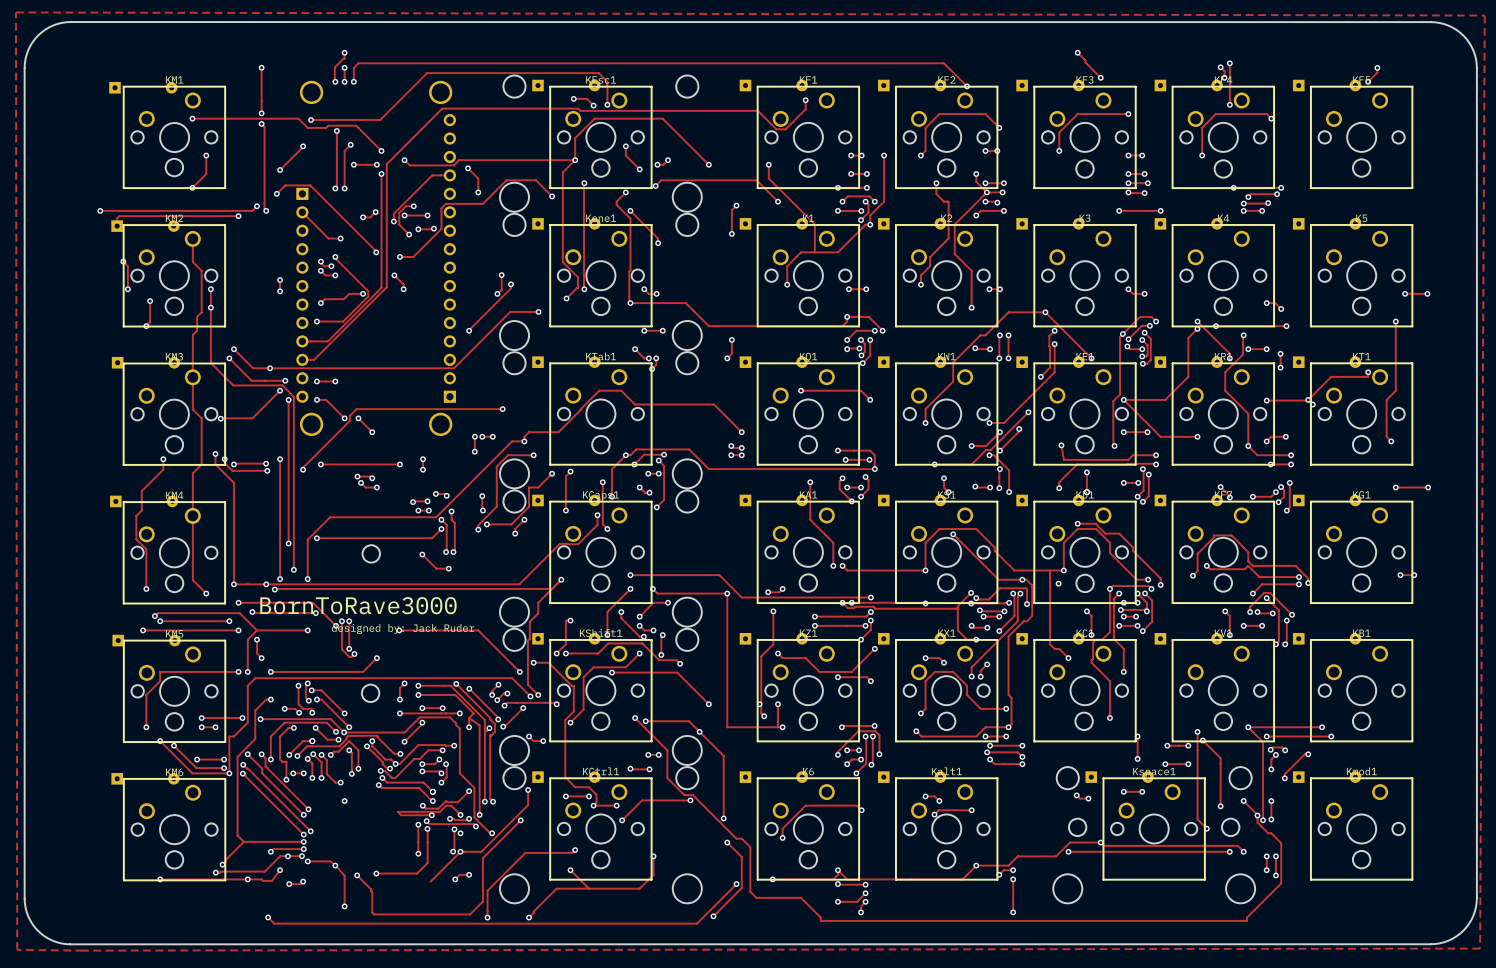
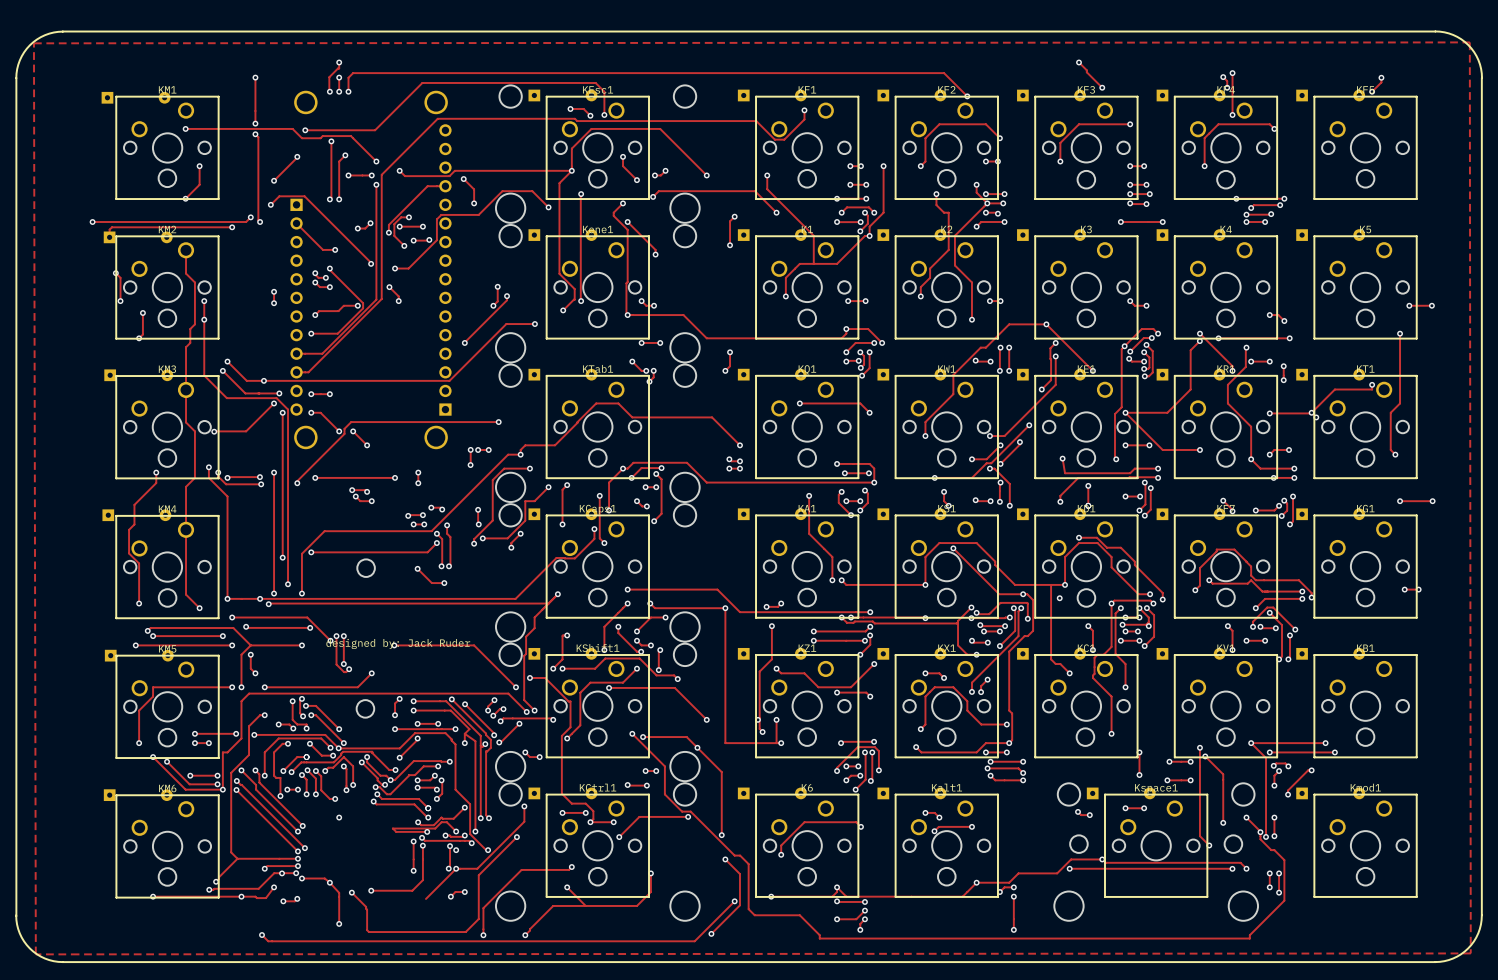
zone outline: (15, 12) (17, 949) (1480, 948) (1484, 15) (15, 12) -> (1469, 42) (33, 43) (35, 954) (1470, 953) (1469, 42)
board edge: (70, 22) (1430, 22) (1444, 24) (1456, 29) (1471, 46) (1476, 67) (1476, 898) (1474, 911) (1469, 923) (1452, 938) (1430, 944) (70, 944) (57, 942) (44, 936) (30, 920) (24, 898) (24, 68) (28, 50) (38, 35) (53, 25) (70, 22) -> none
line: none -> (62, 31) (1435, 31)
line: none -> (62, 31) (45, 35) (29, 45) (19, 60) (16, 78)
line: none -> (1435, 31) (1453, 34) (1468, 45) (1478, 60) (1482, 78)
line: none -> (1481, 77) (1481, 915)
line: none -> (16, 78) (16, 916)
text: BornToRave3000 (358, 605) -> none
line: none -> (16, 915) (19, 933) (29, 948) (44, 958) (62, 962)
line: none -> (1481, 915) (1478, 933) (1468, 948) (1453, 958) (1435, 962)
line: none -> (62, 962) (1435, 962)

